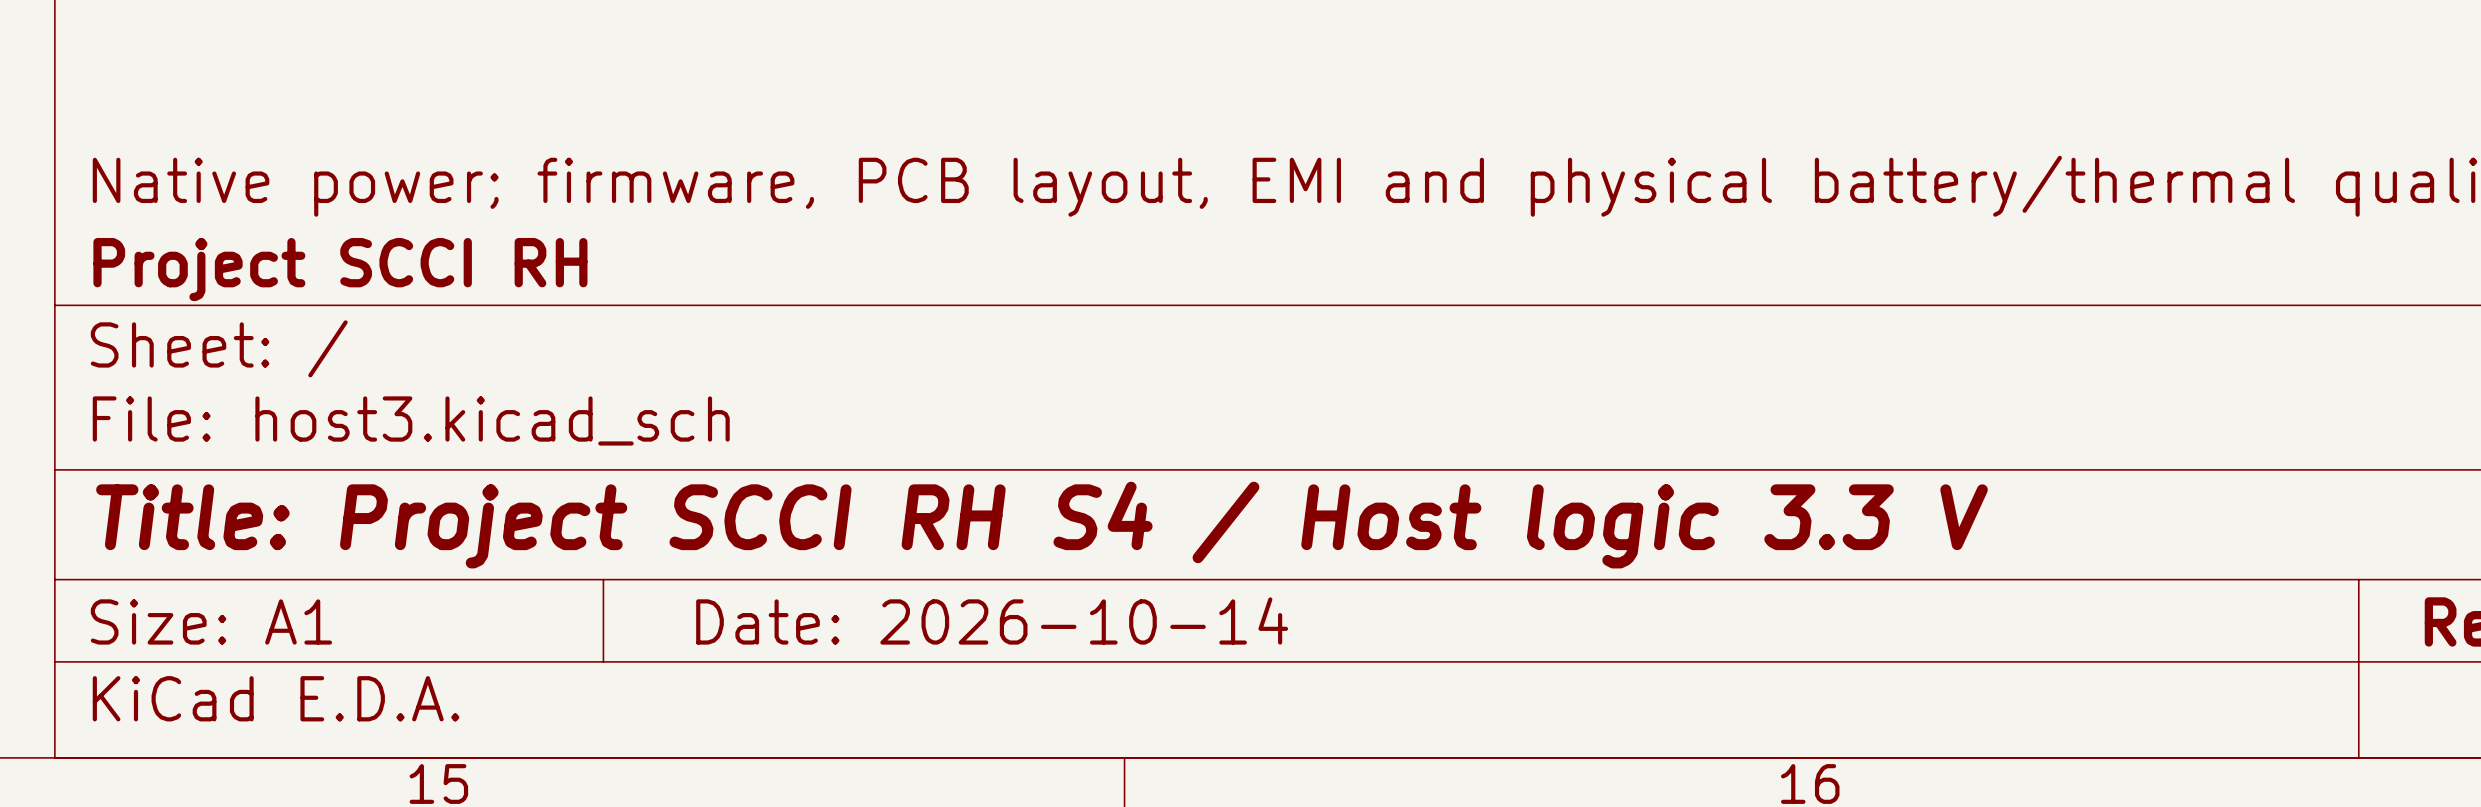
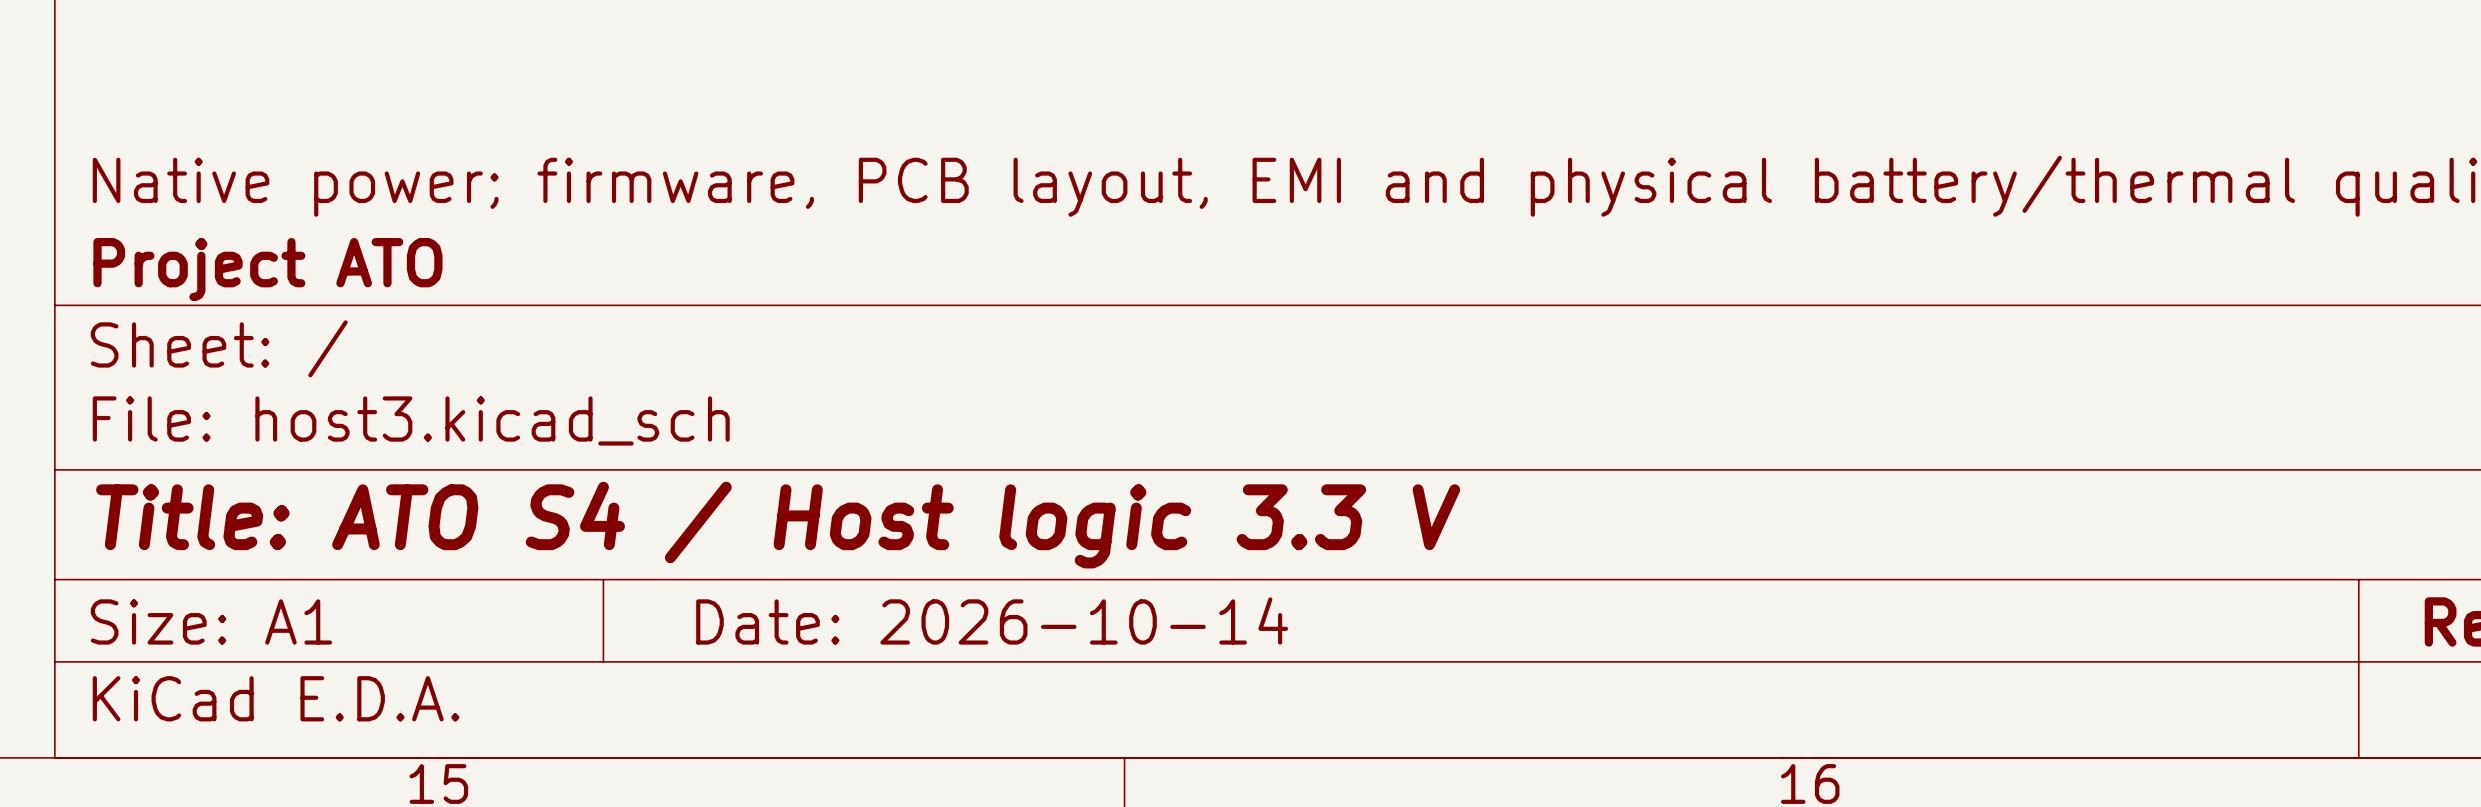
title block: Project SCCI RH (340, 269) -> Project ATO (267, 269)
title block: Title: Project SCCI RH S4 / Host logic 3.3 V (1041, 525) -> Title: ATO S4 / Host logic 3.3 V (778, 525)

